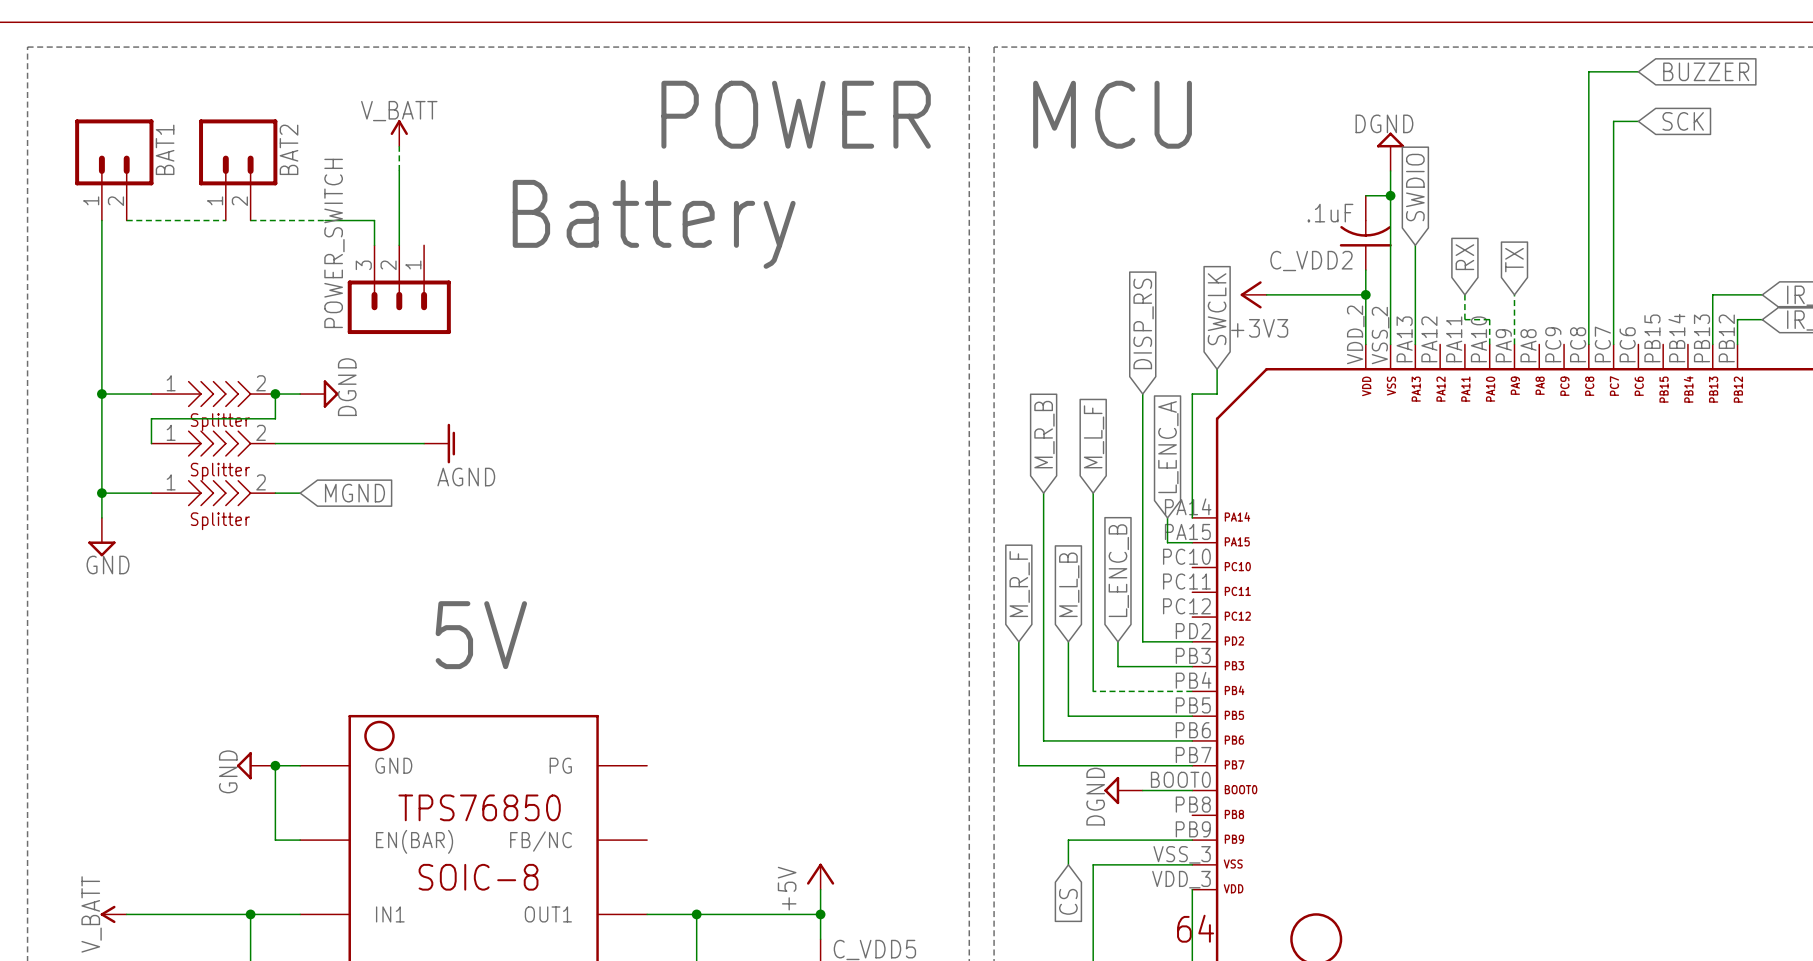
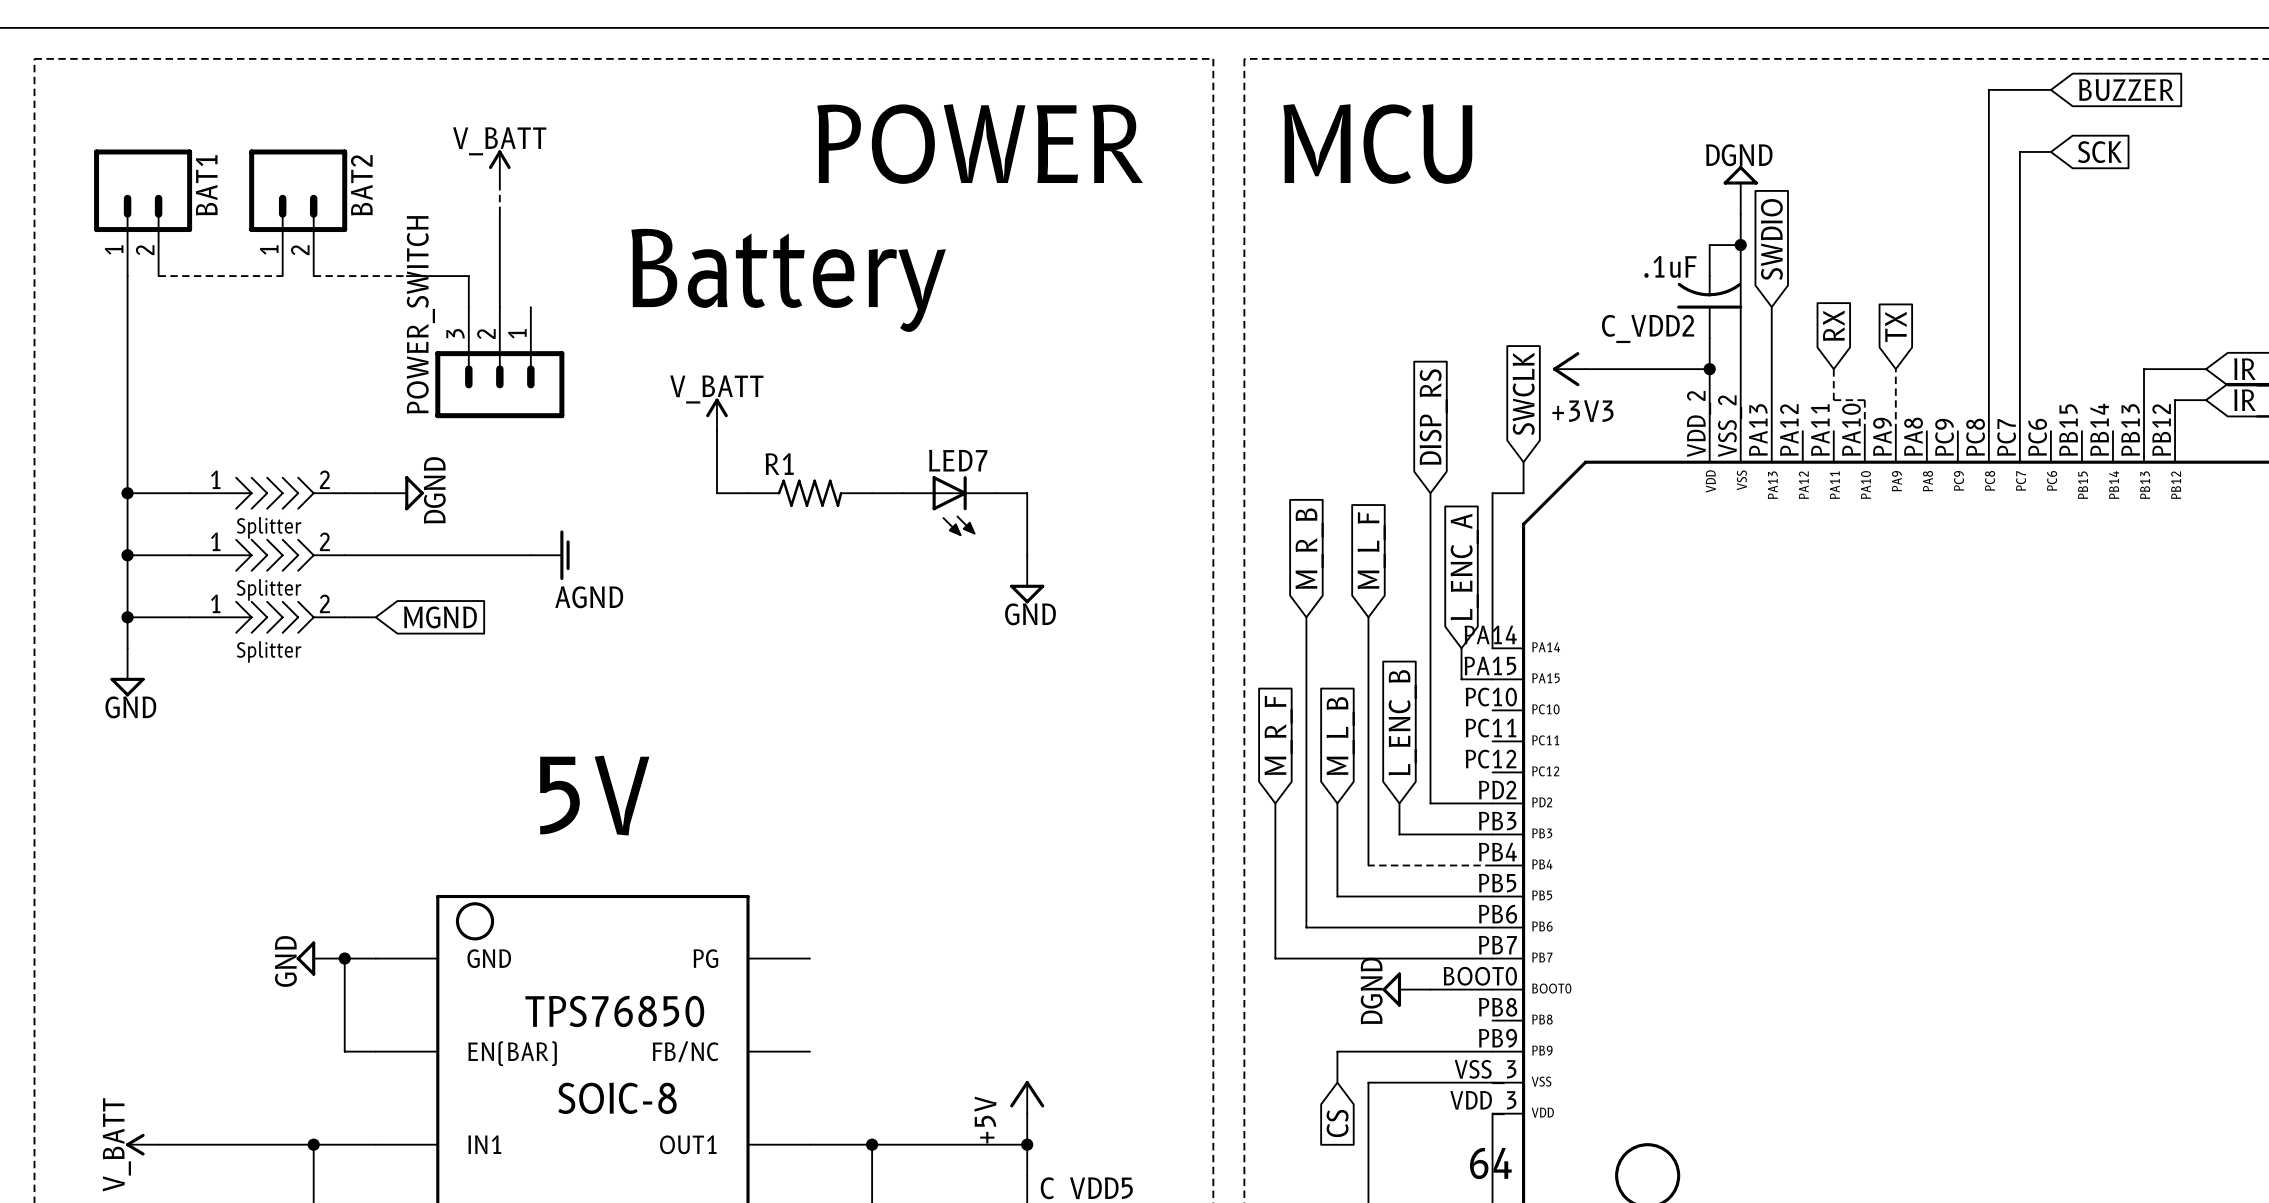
power symbol: none -> V_BATT (716, 414)
wire: none -> (716, 431) (716, 493) (748, 493)
wire: (275, 394) (275, 418) (151, 418) (151, 443) -> (127, 555) (189, 555)
junction: (275, 394) -> none
R1: none -> (810, 493)
wire: none -> (872, 493) (903, 493)
wire: none -> (996, 493) (1027, 493) (1027, 555)
LED7: none -> (949, 506)
junction: none -> (127, 555)
power symbol: none -> GND (1027, 579)

